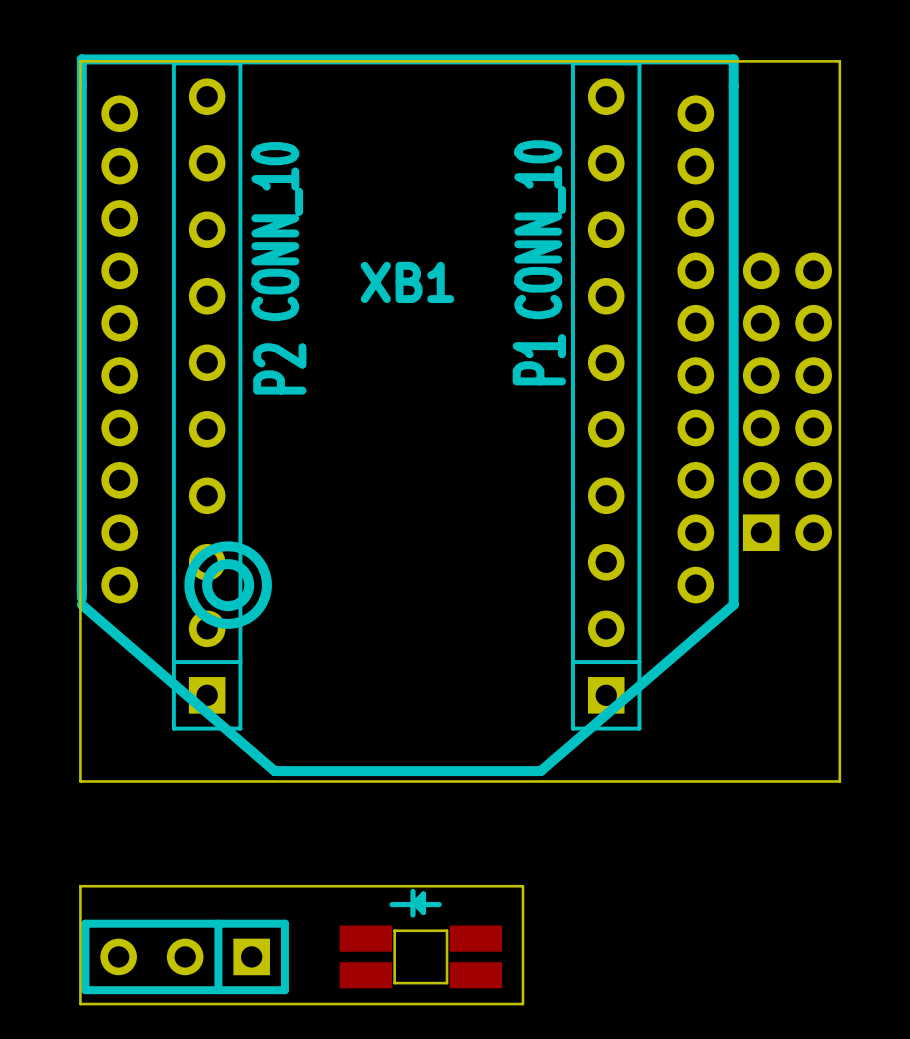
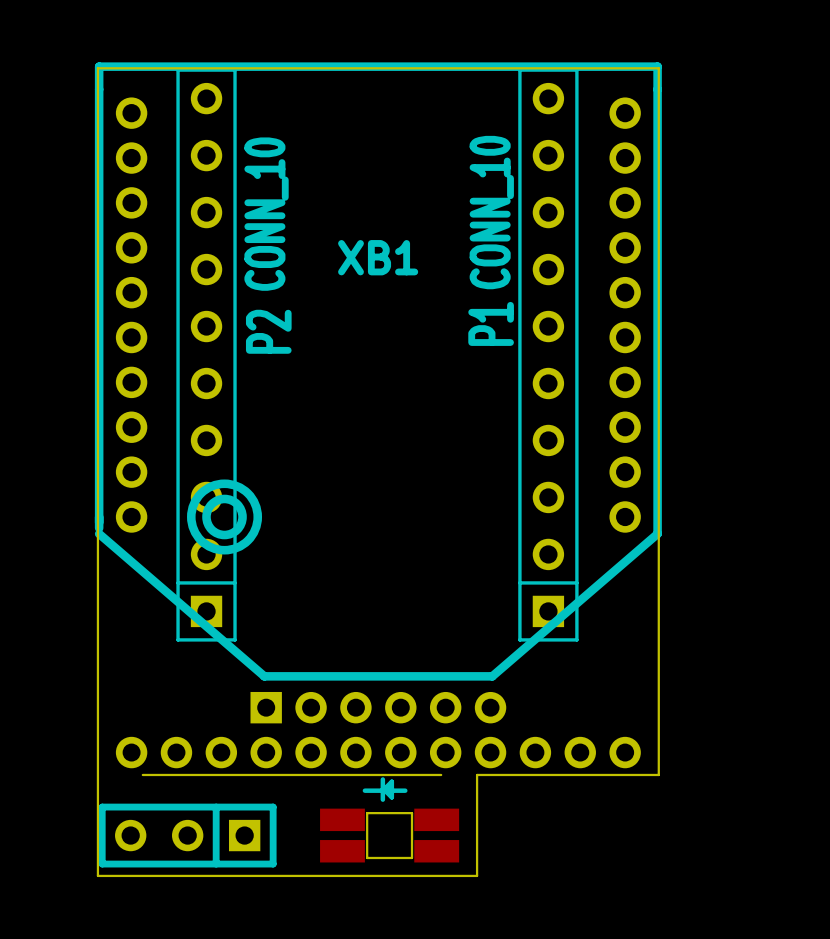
board edge: (735, 61) (839, 61) (839, 781) (80, 781) -> (658, 68) (658, 774) (477, 774)
part rotation: 0° (787, 401) -> 90° clockwise (378, 730)
part position: (787, 401) -> (378, 730)
part: none -> (176, 752)
part: none -> (580, 752)
board edge: (80, 886) (132, 886) -> (97, 774) (97, 685)
board edge: (481, 886) (522, 886) -> none

